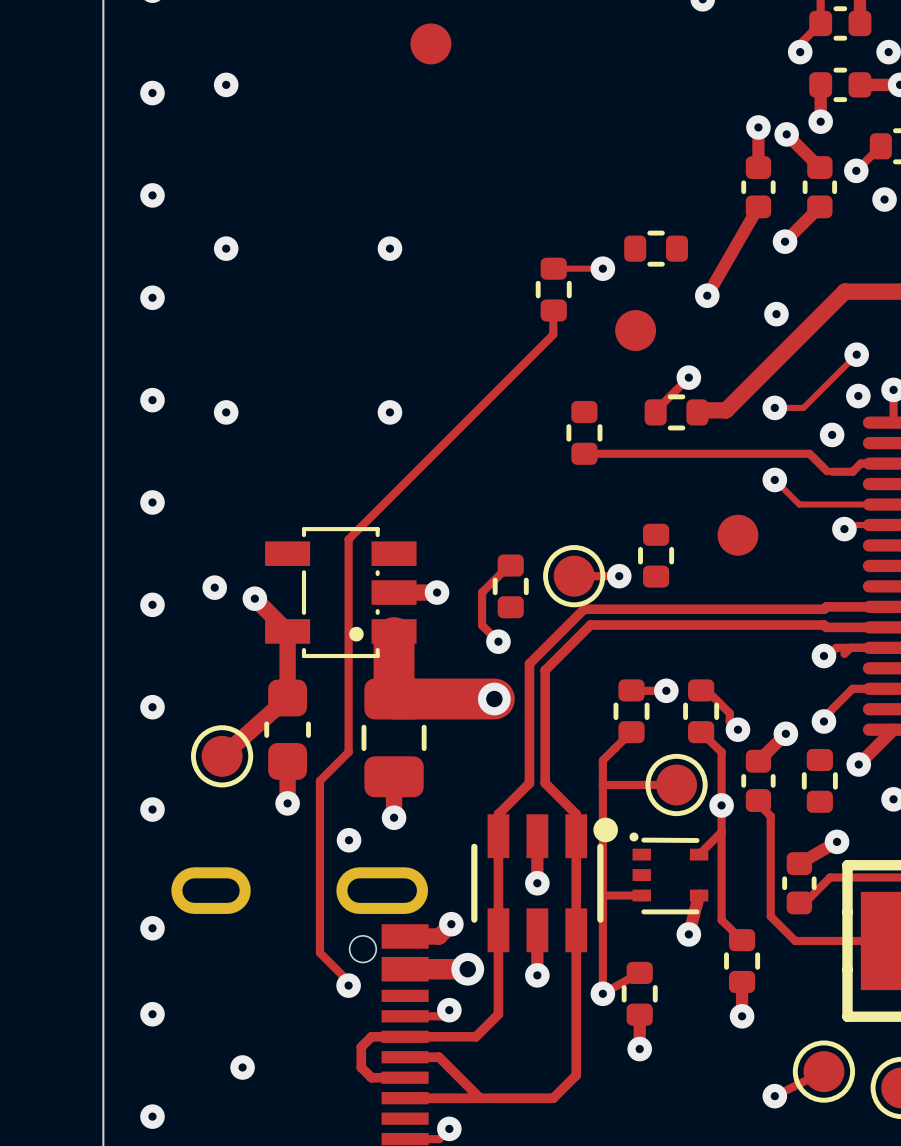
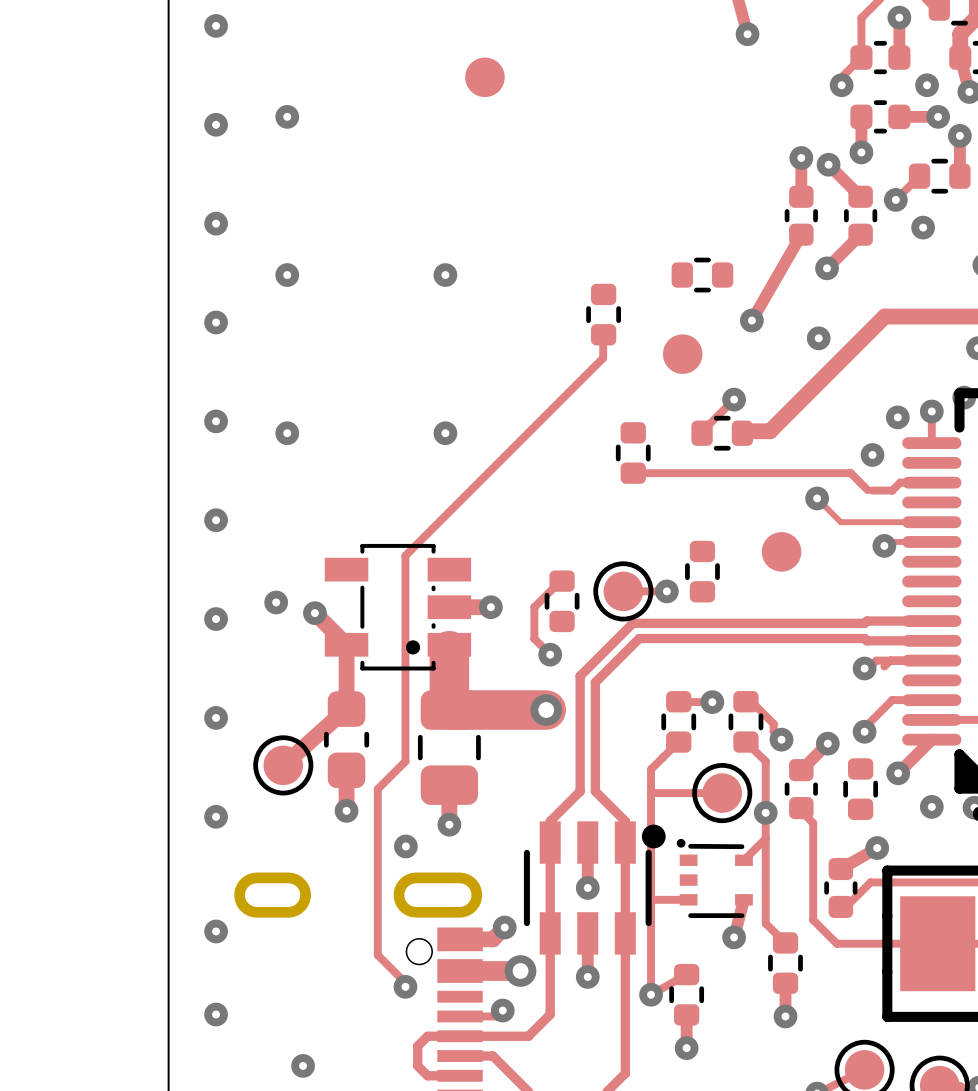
track: (554, 268) (601, 268) -> none
via: (602, 268) -> none
track: (856, 354) (803, 407) (774, 407) -> none
via: (856, 354) -> none
via: (774, 407) -> none

